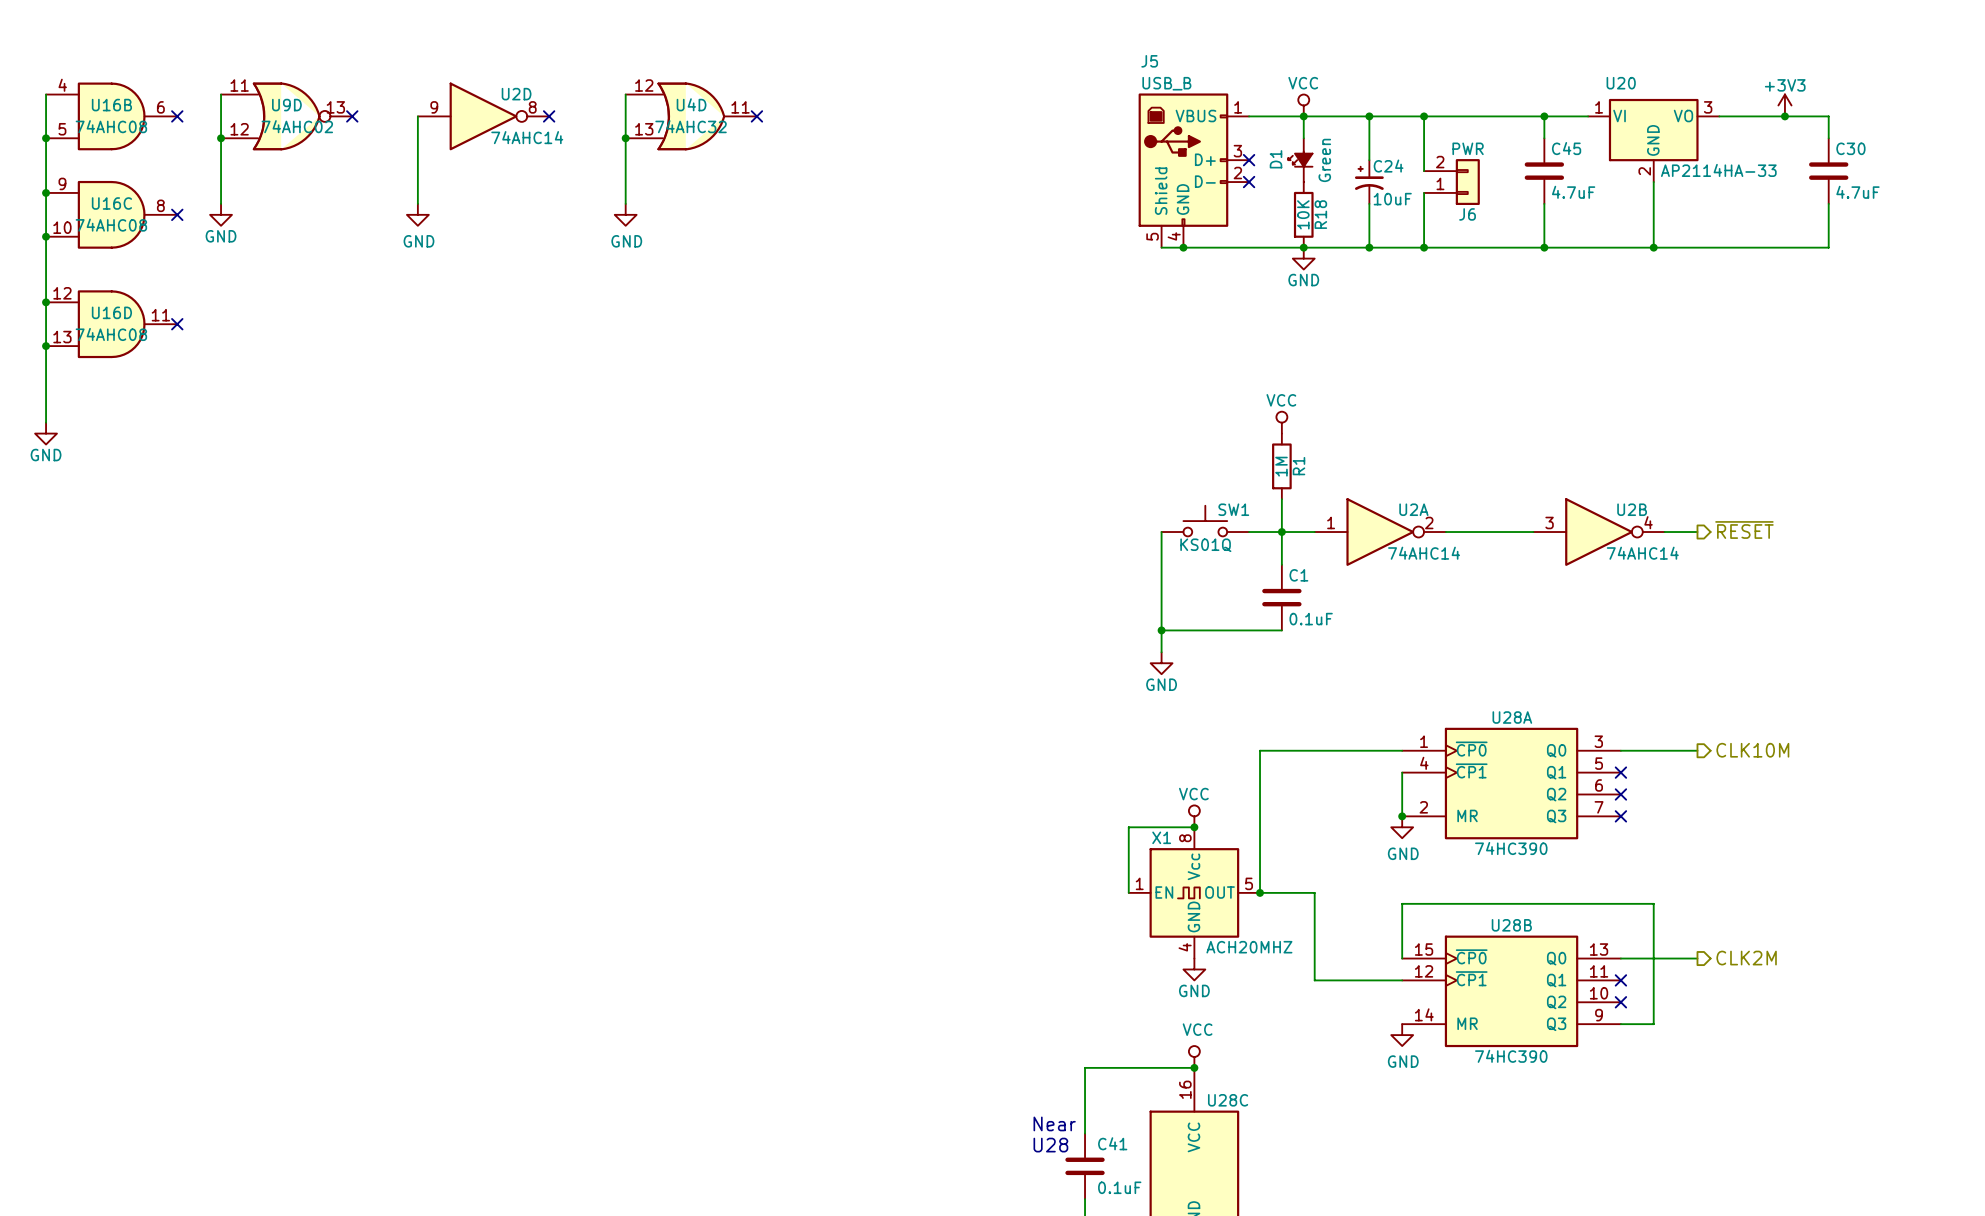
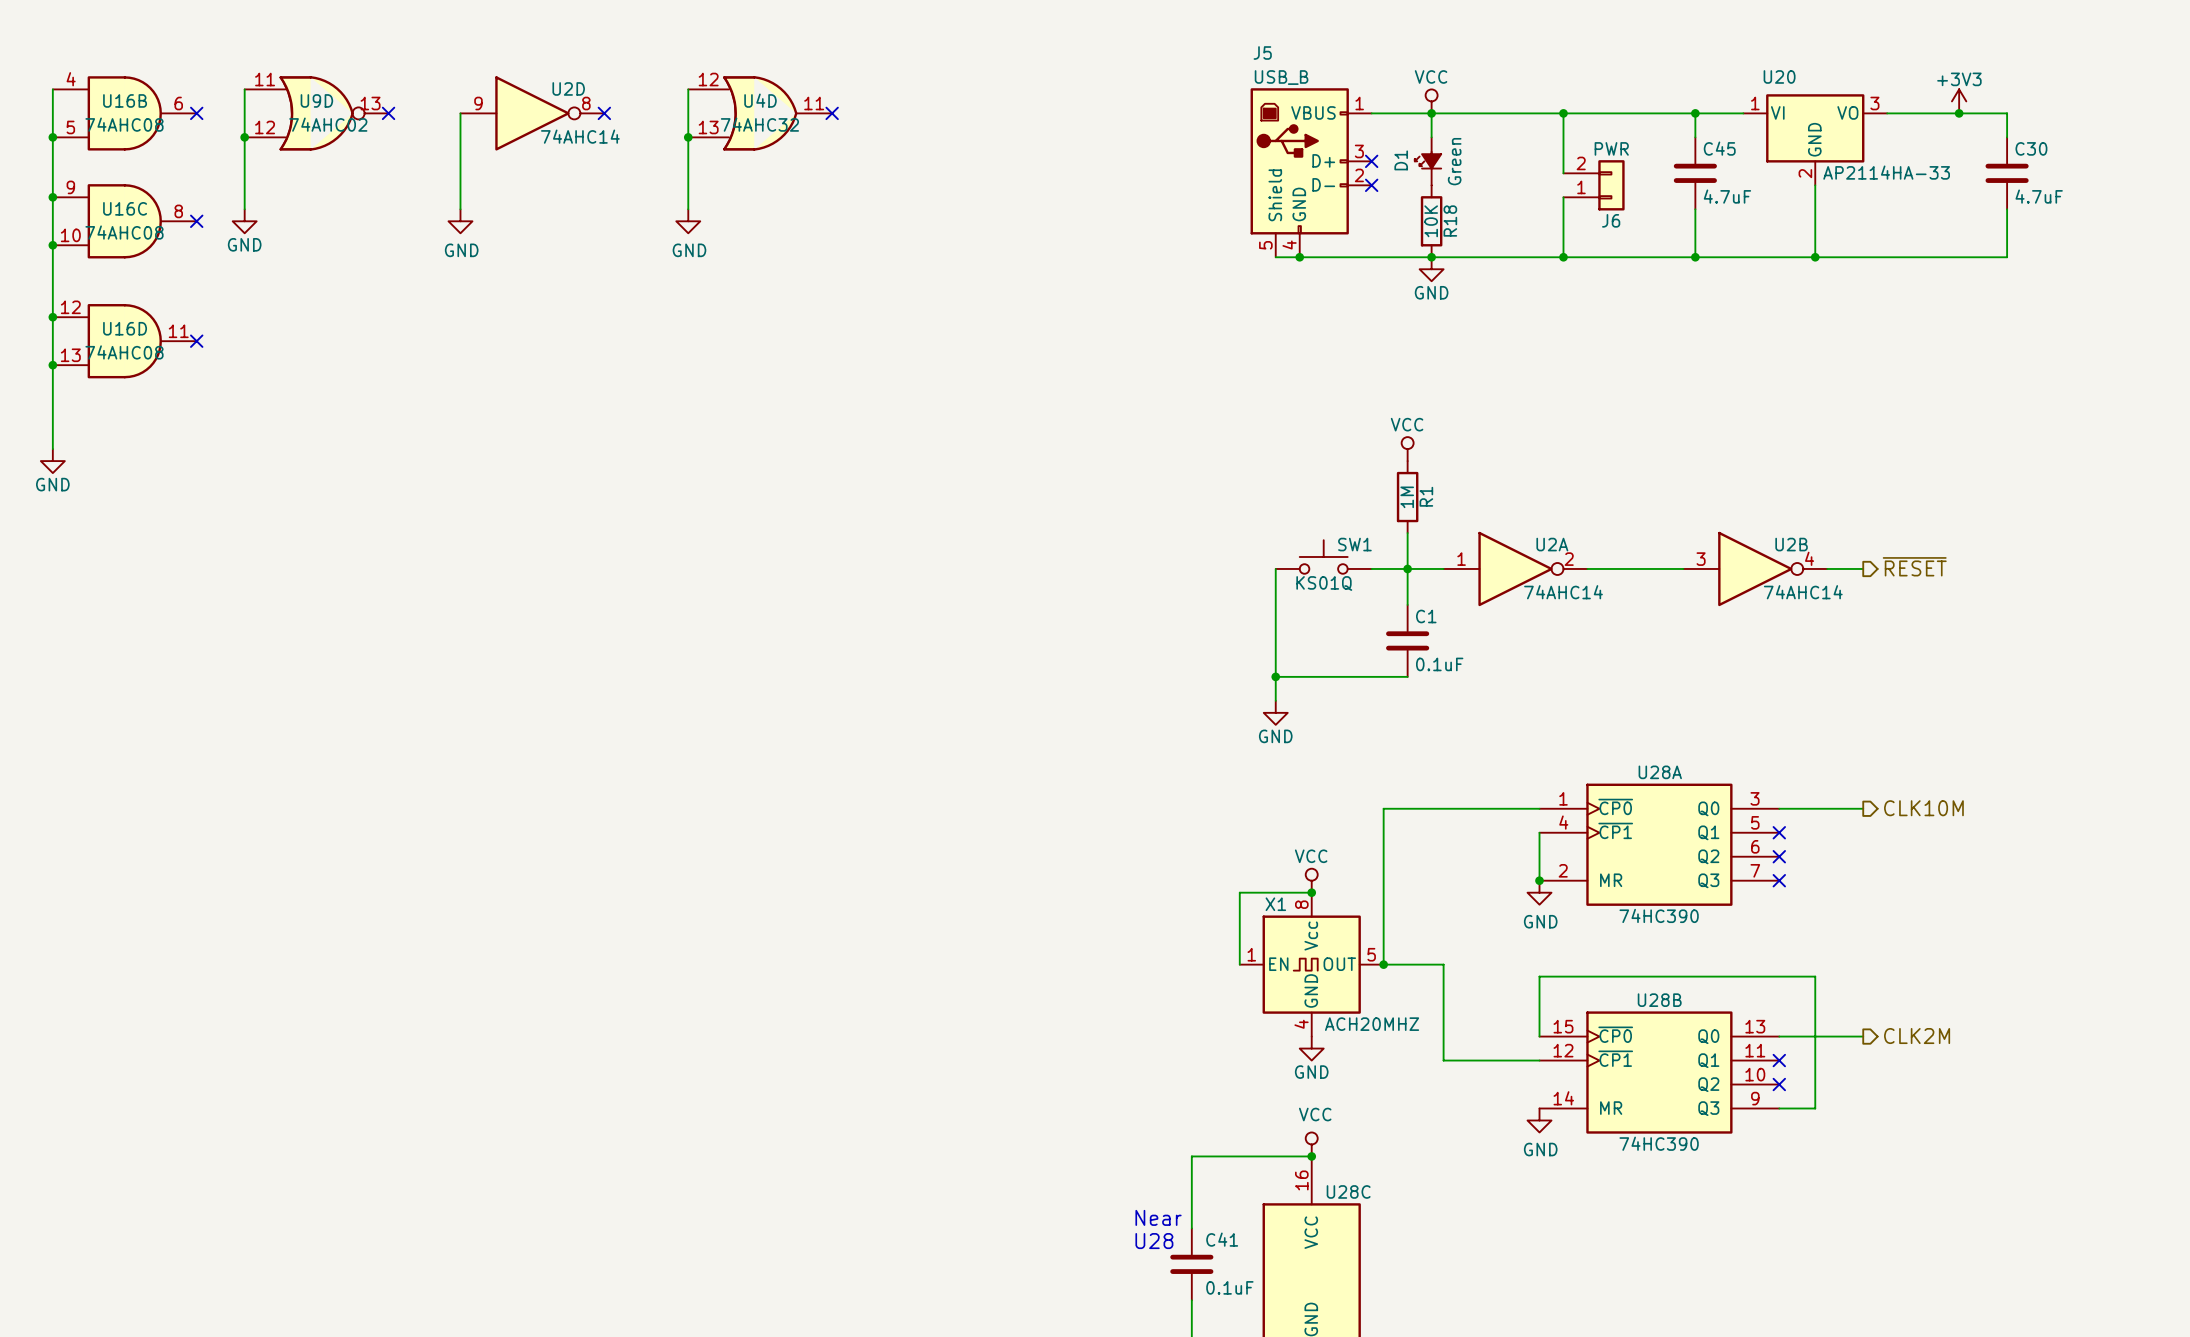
wire: (1369, 116) (1369, 160) -> none
junction: (1369, 116) -> none
C24: 10uF (1369, 182) -> none
wire: (1369, 203) (1369, 247) -> none
junction: (1369, 247) -> none

